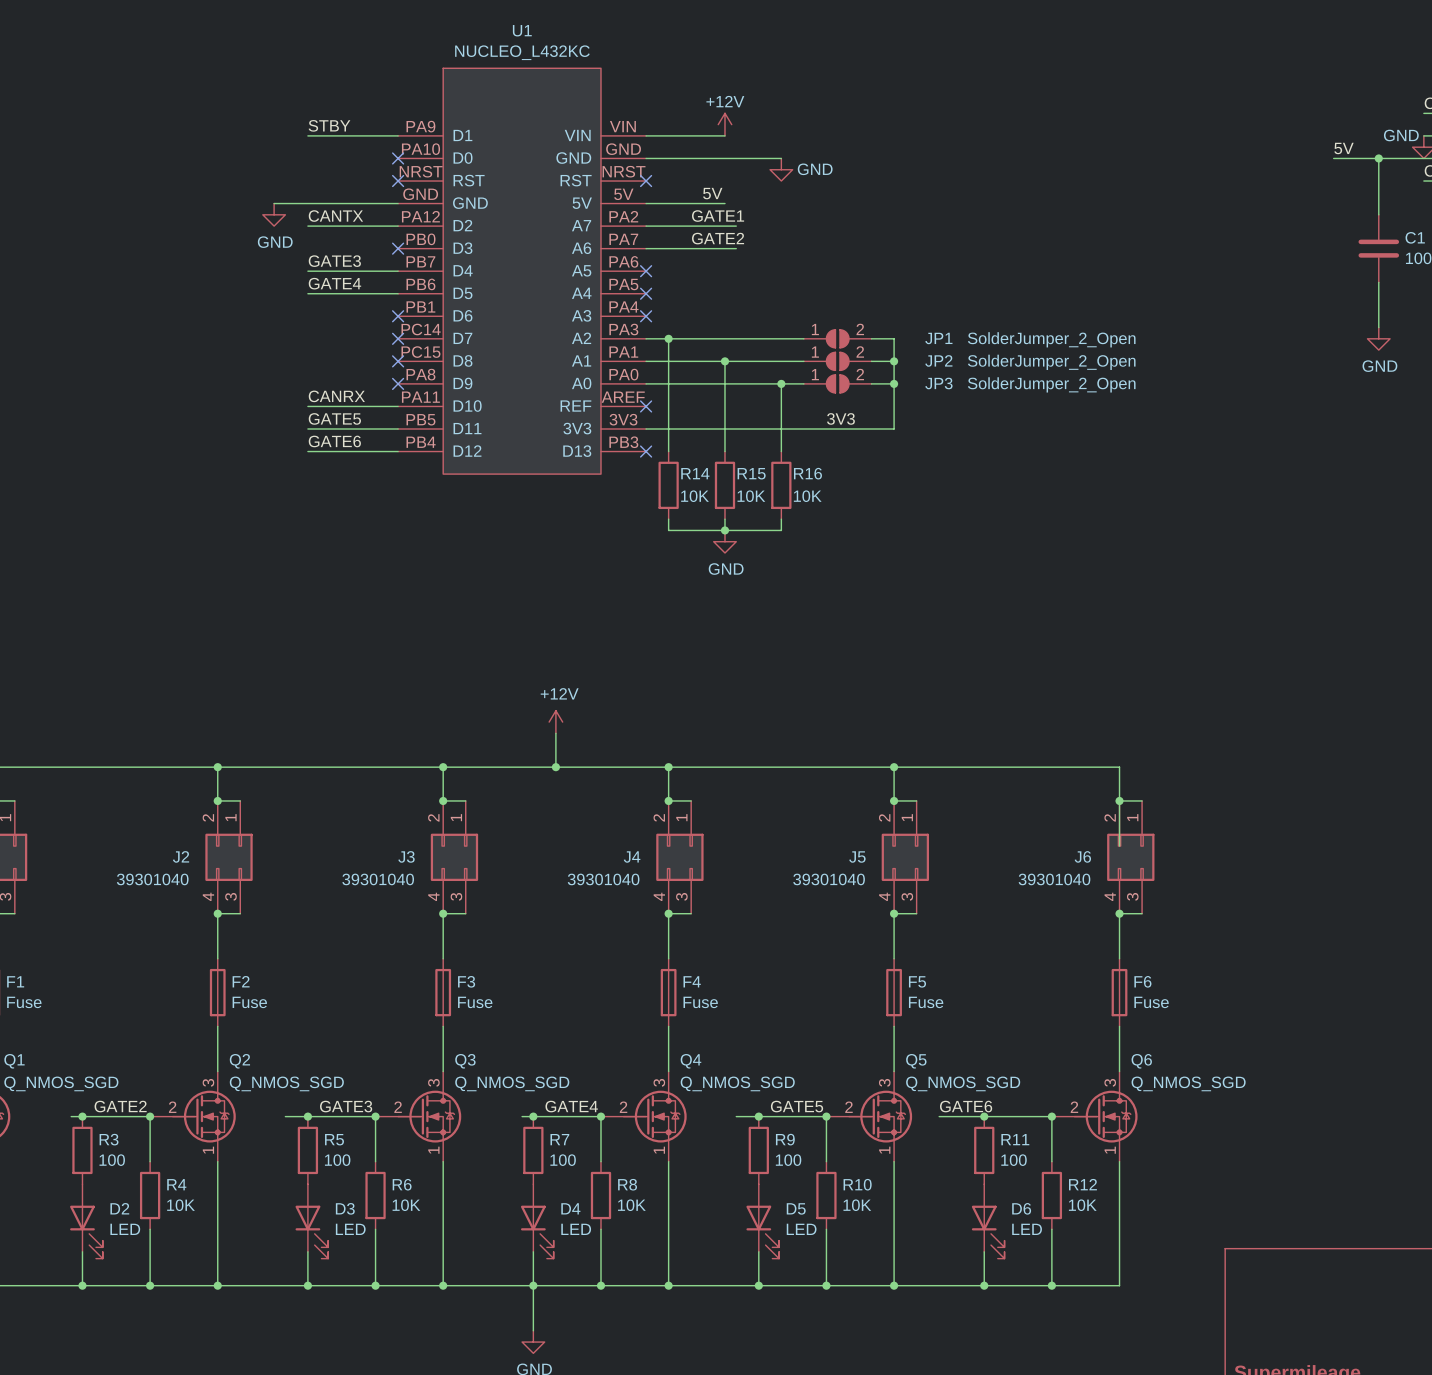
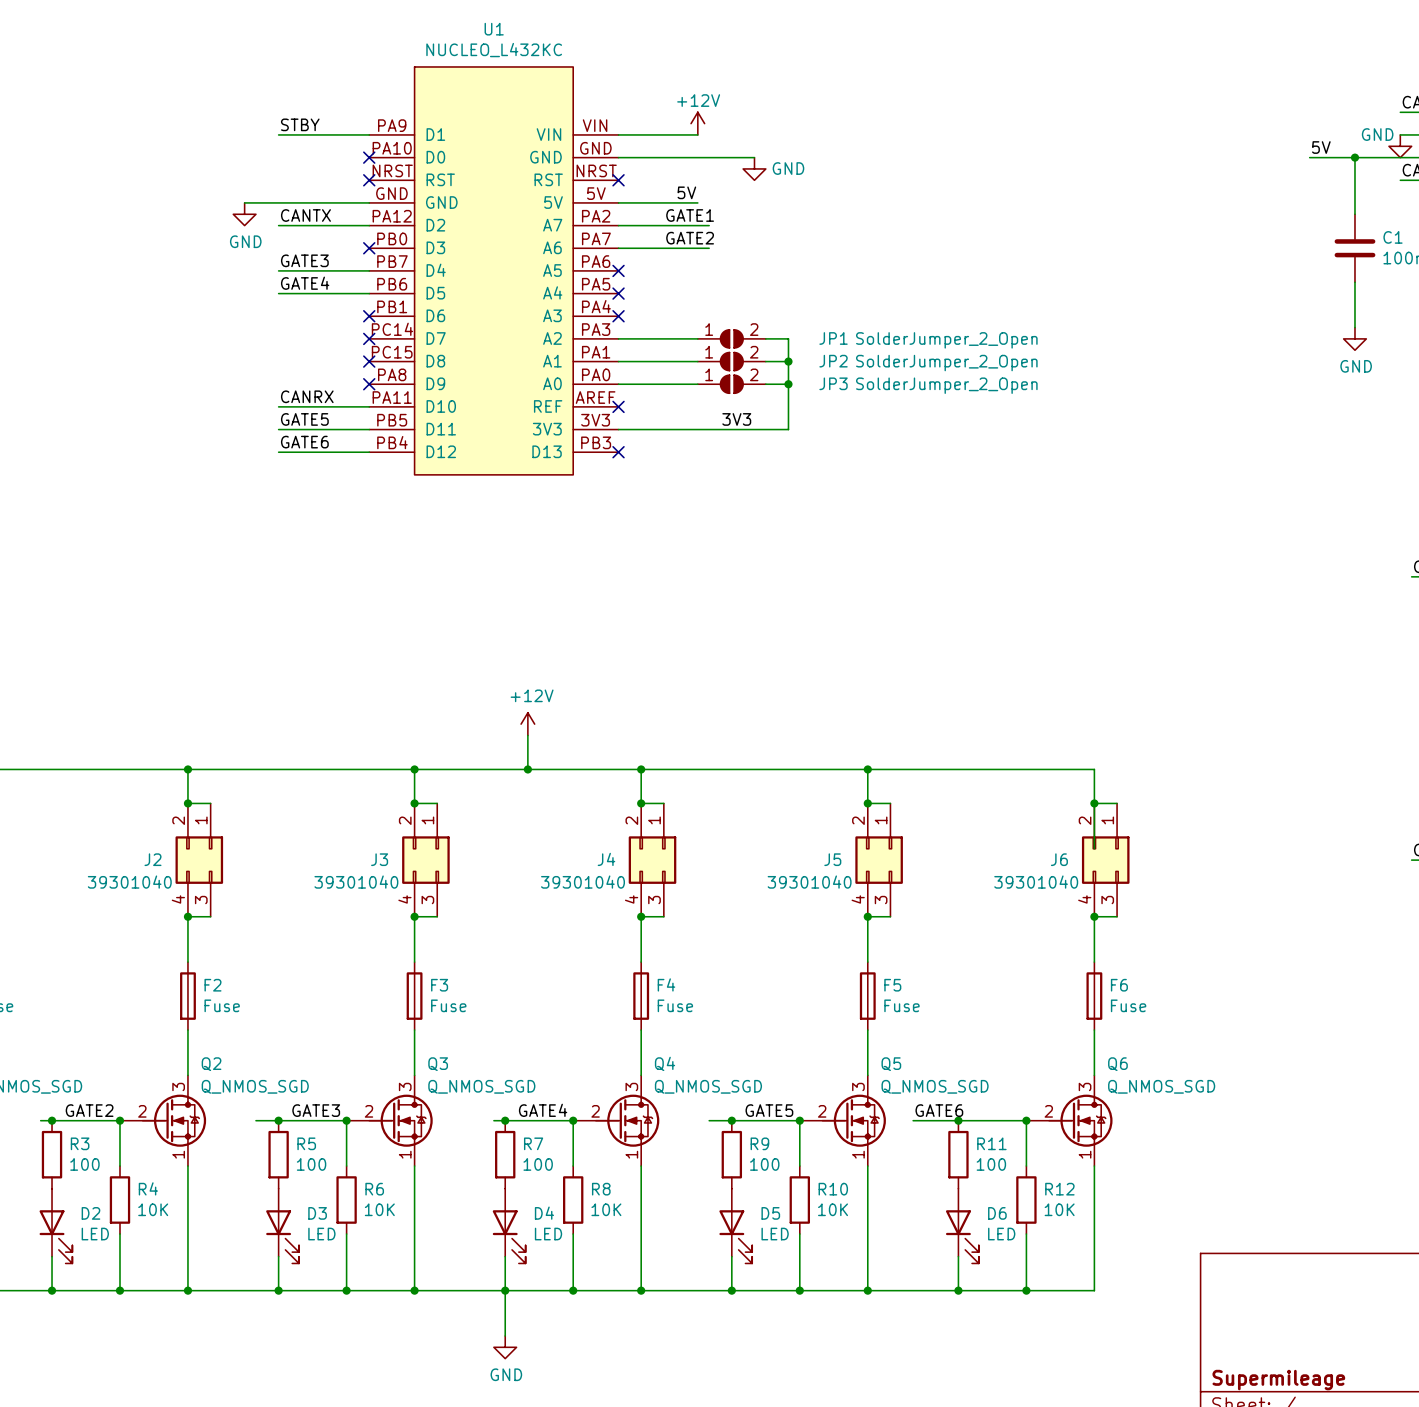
wire: (668, 338) (668, 451) -> none
junction: (668, 338) -> none
JP1 position: (837, 338) -> (731, 338)
wire: (871, 338) (894, 338) (894, 428) (815, 428) -> (777, 338) (788, 338) (788, 429)
junction: (724, 361) -> none
wire: (792, 361) (724, 361) (724, 451) -> none
junction: none -> (788, 361)
JP2 position: (837, 361) -> (731, 361)
wire: (871, 361) (894, 361) -> none
junction: (894, 361) -> none
wire: (781, 383) (781, 451) -> none
junction: (781, 383) -> none
junction: none -> (788, 384)
JP3 position: (837, 383) -> (731, 384)
wire: (871, 383) (894, 383) -> none
junction: (894, 383) -> none
label position: 3V3 (840, 418) -> 3V3 (736, 419)
R14: 10K (668, 485) -> none
R15: 10K (724, 485) -> none
R16: 10K (781, 485) -> none
wire: (668, 519) (668, 530) (781, 530) (781, 519) -> none
wire: (724, 519) (724, 530) -> none
junction: (724, 530) -> none
power symbol: GND (724, 541) -> none

